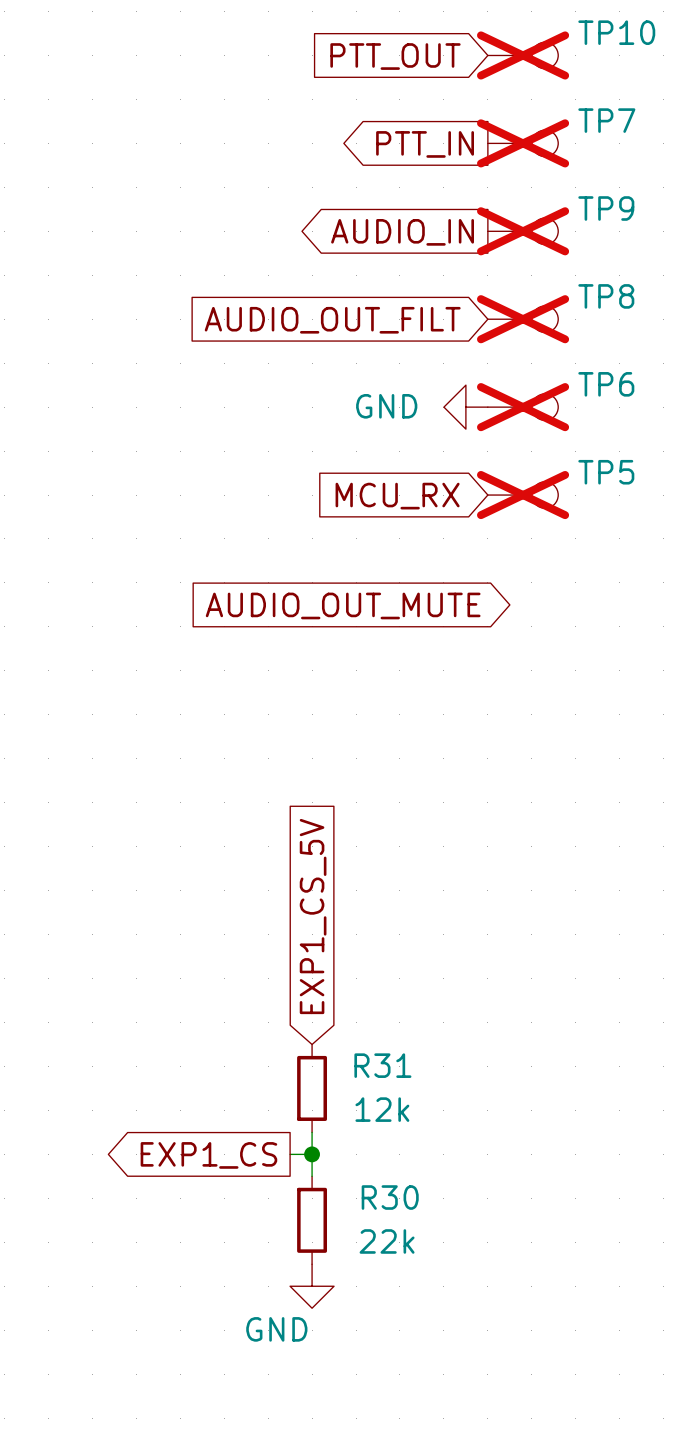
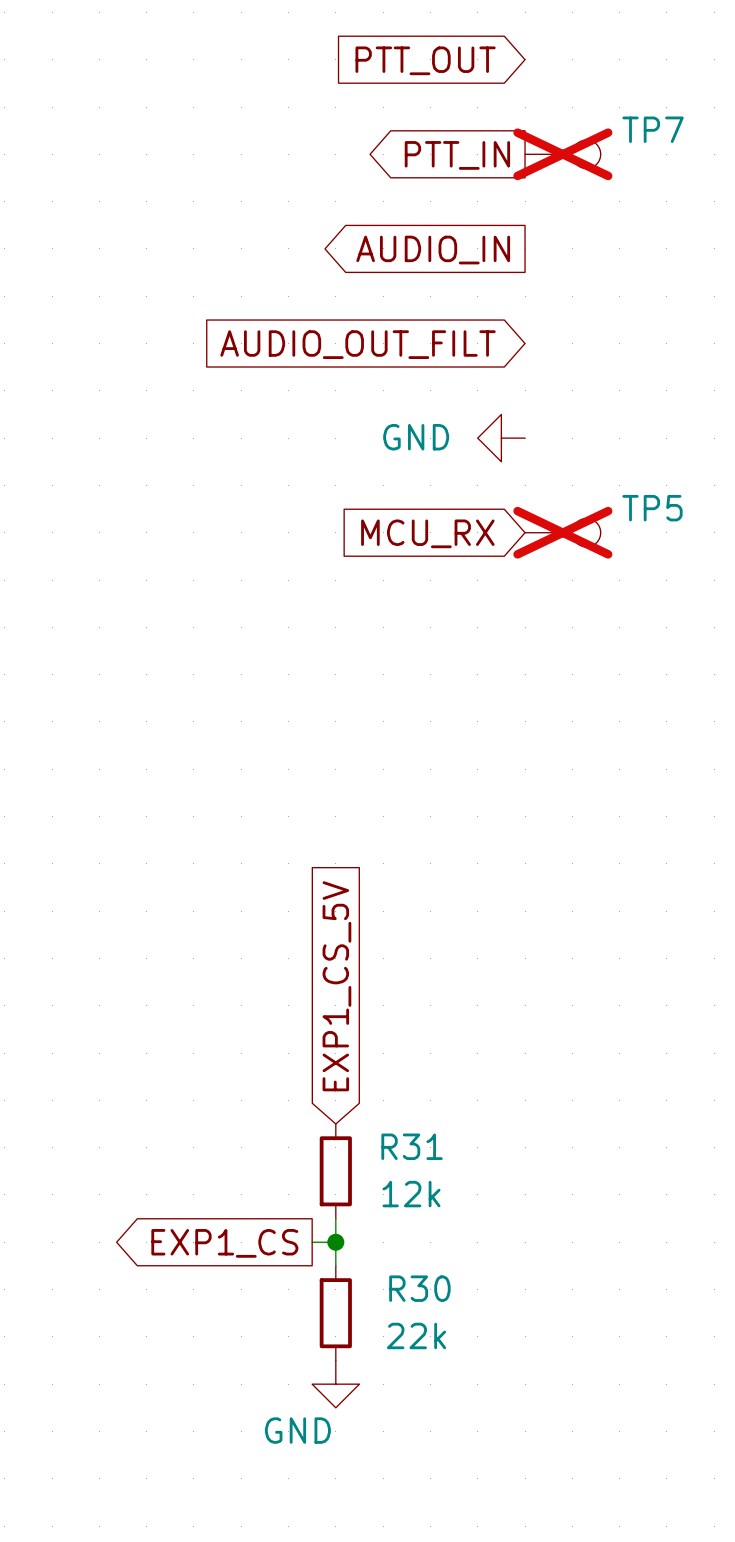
TP10: (523, 55) -> none
TP9: (523, 231) -> none
TP8: (523, 319) -> none
TP6: (523, 407) -> none
global label: AUDIO_OUT_MUTE (343, 605) -> none

